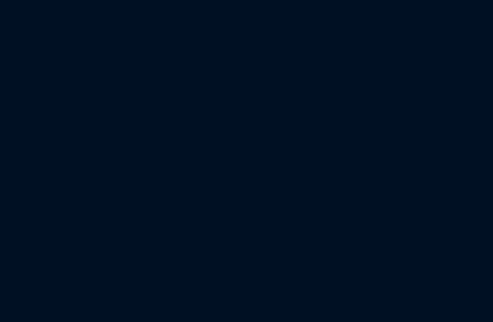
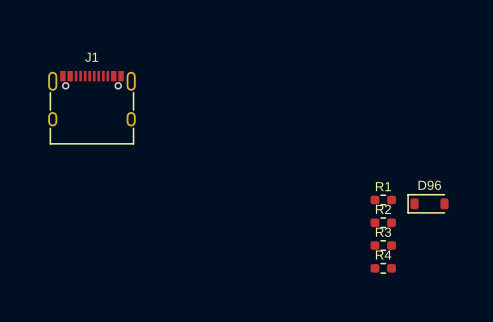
J1: none -> (91, 107)
R1: none -> (383, 199)
D96: none -> (428, 203)
R2: none -> (383, 222)
R3: none -> (383, 245)
R4: none -> (383, 268)

